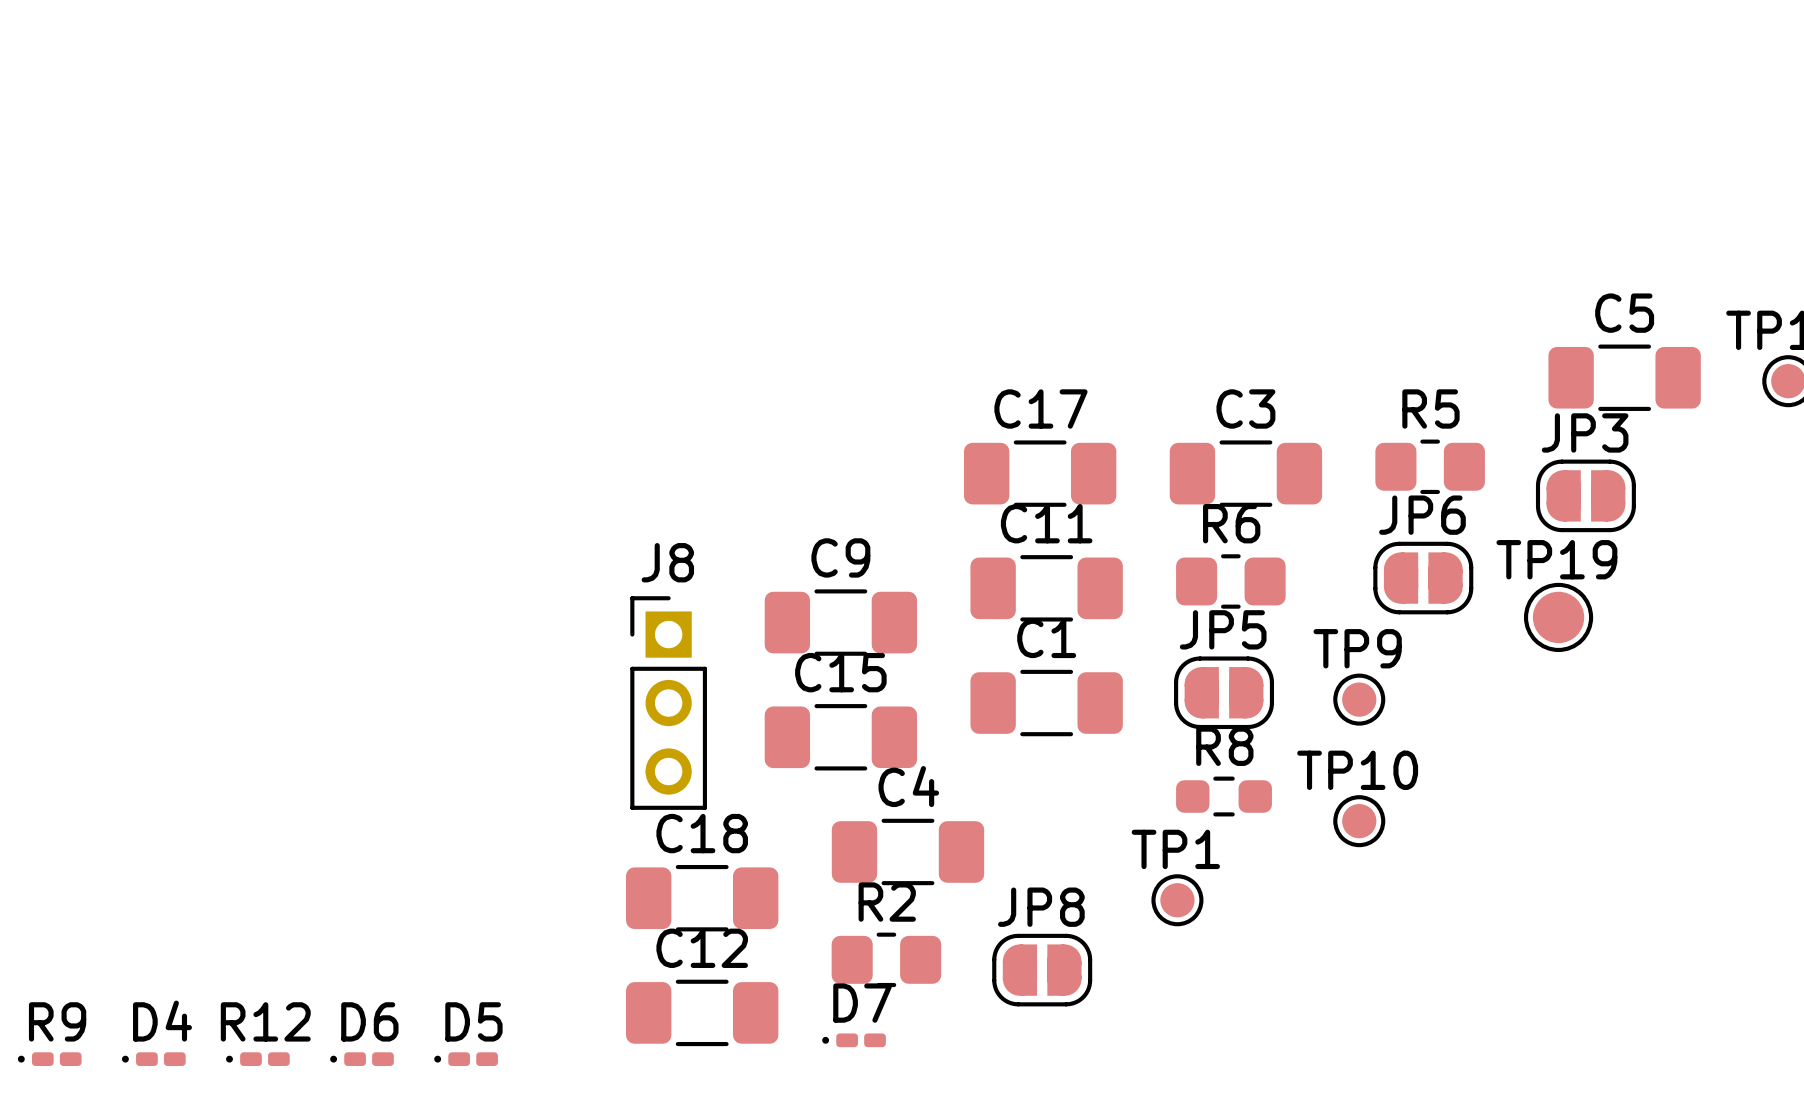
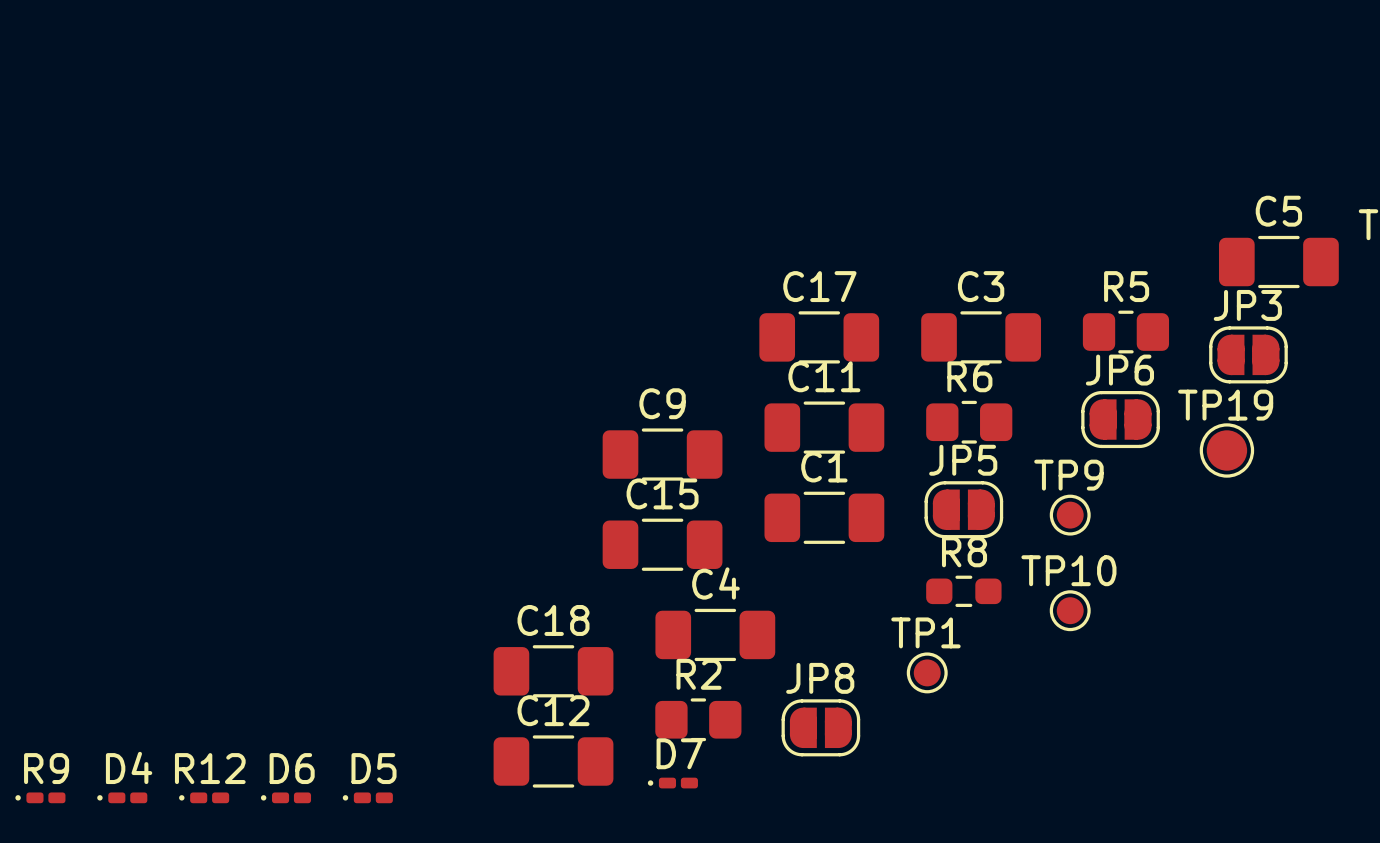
J8: (668, 703) -> none

